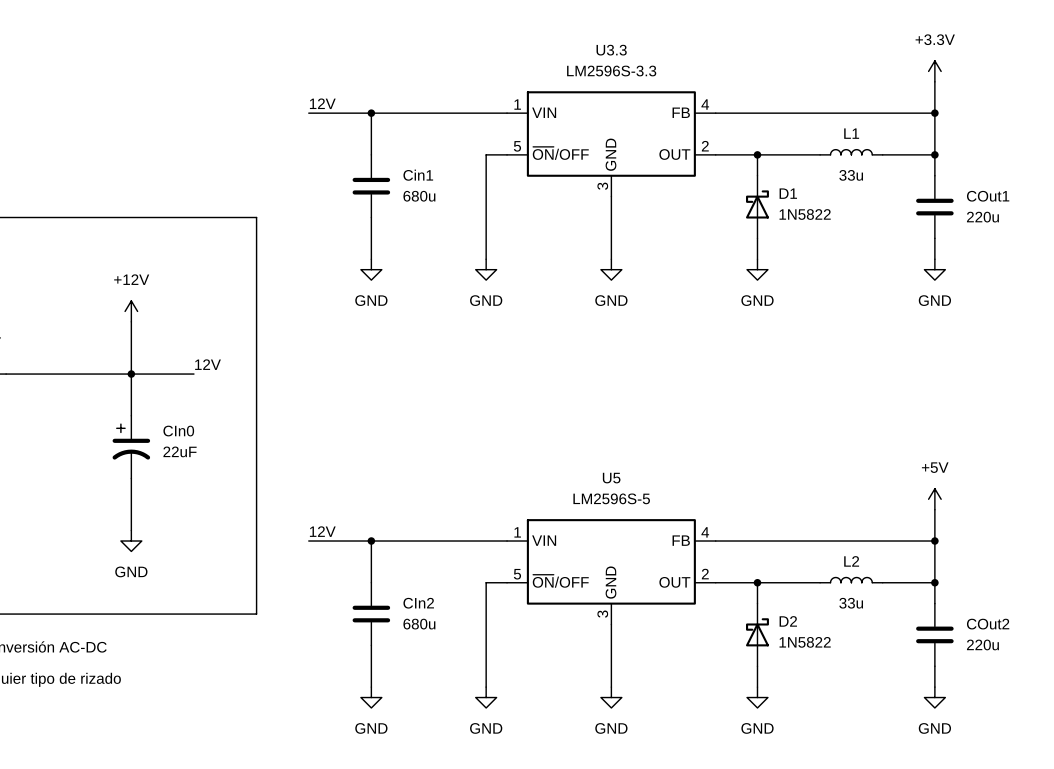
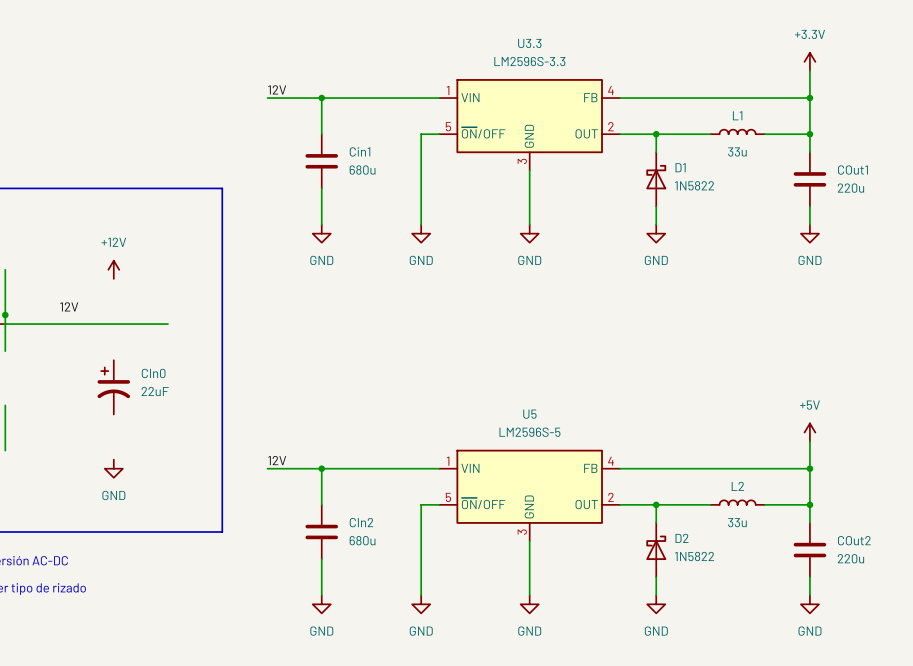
wire: (131, 321) (131, 415) -> (5, 269) (5, 351)
junction: none -> (5, 315)
label position: 12V (208, 364) -> 12V (69, 306)
junction: (131, 374) -> none
wire: (131, 478) (131, 530) -> (5, 405) (5, 450)

